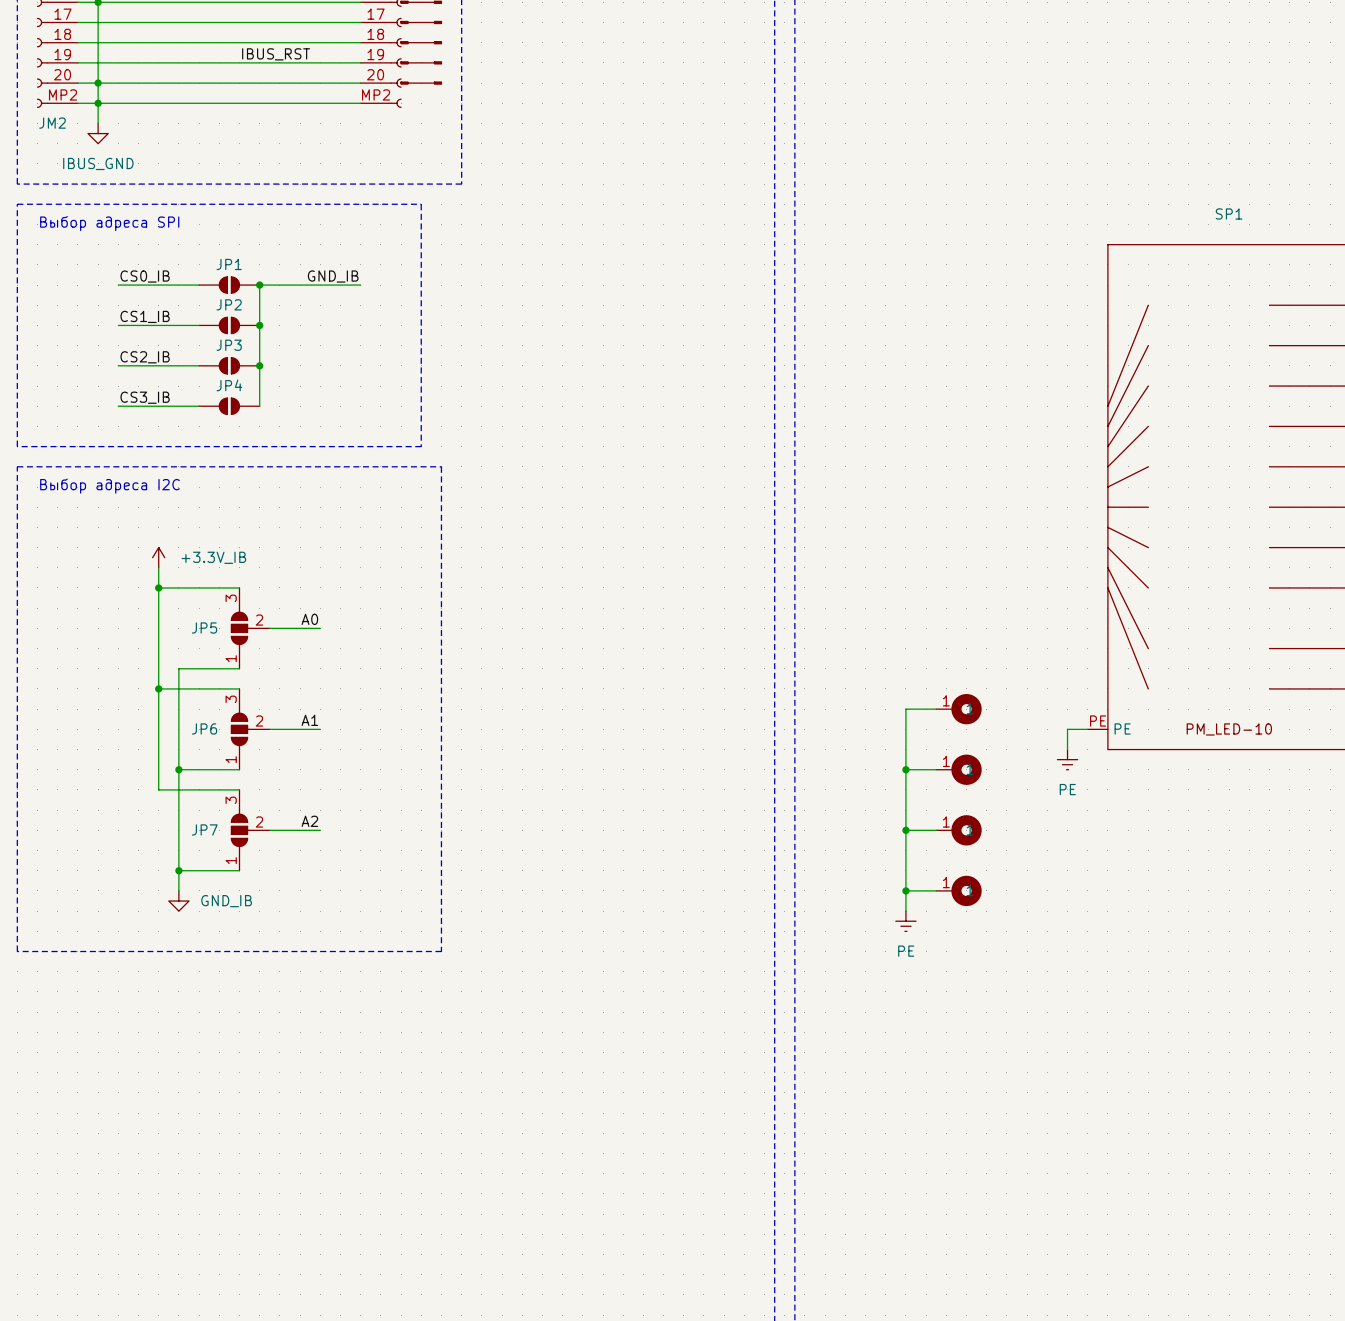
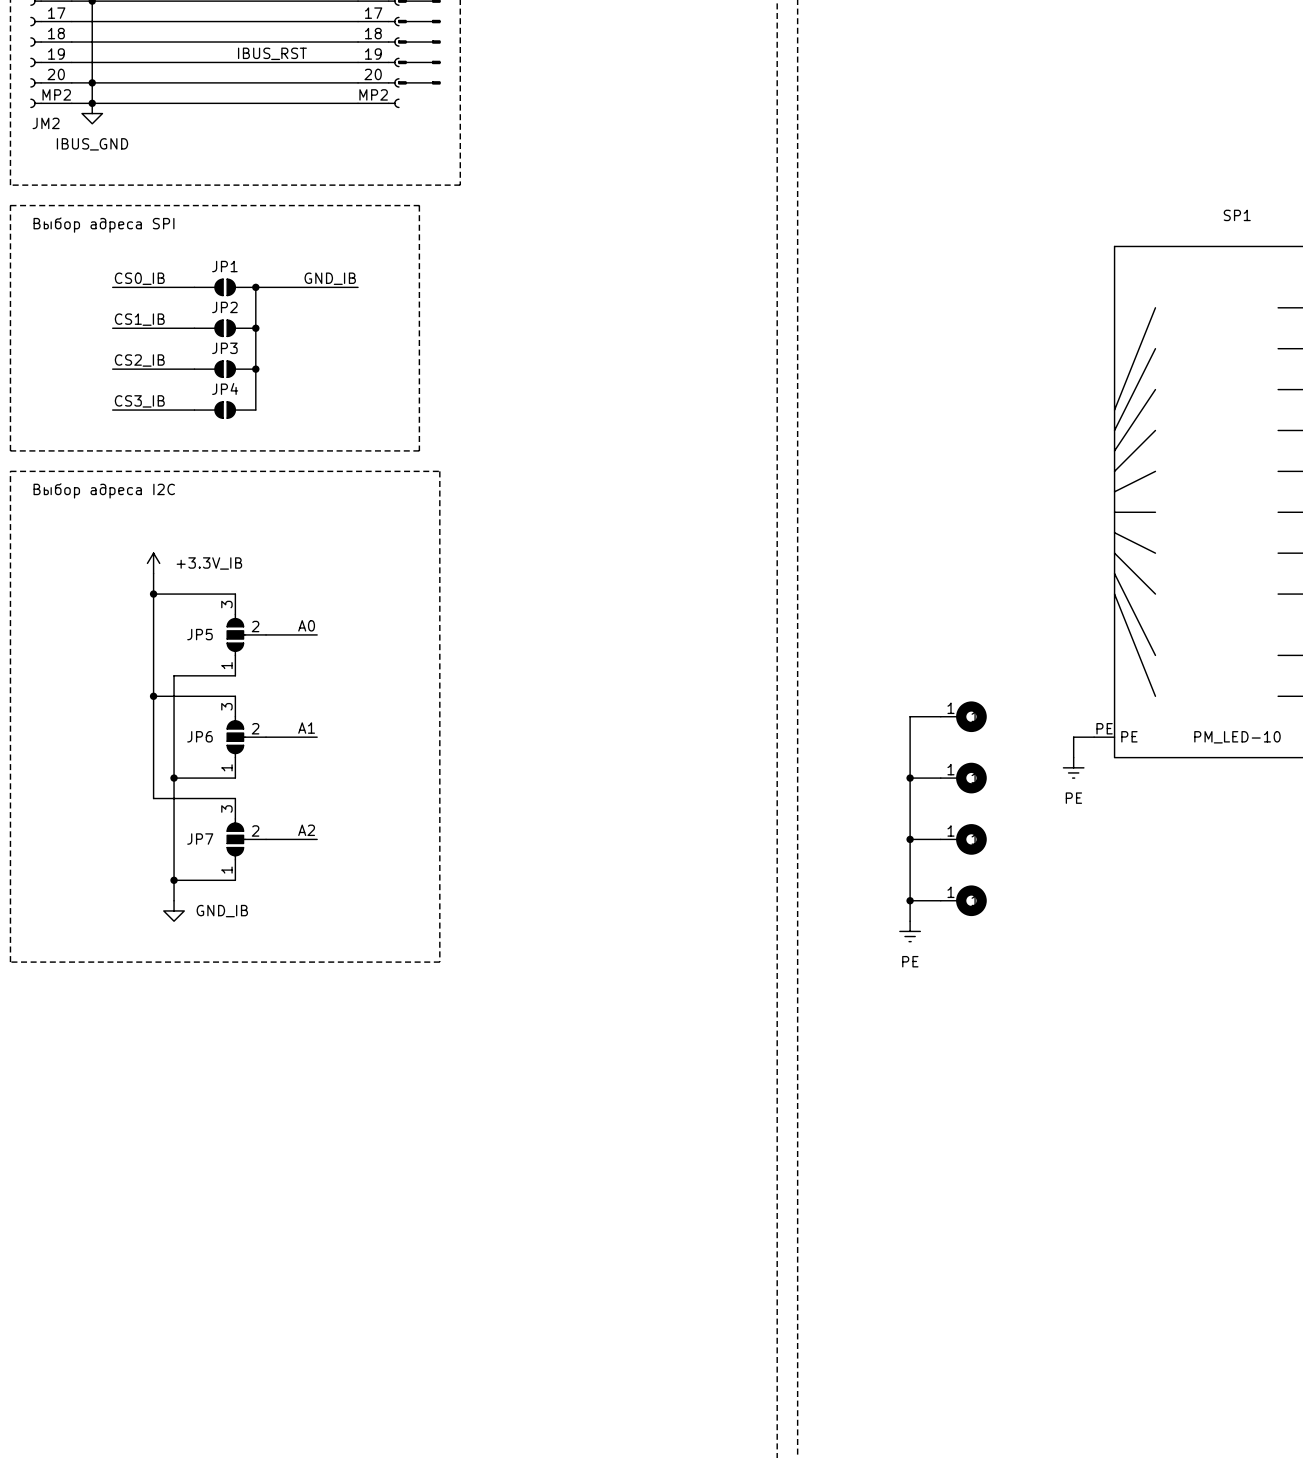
power symbol position: IBUS_GND (98, 133) -> IBUS_GND (92, 113)

